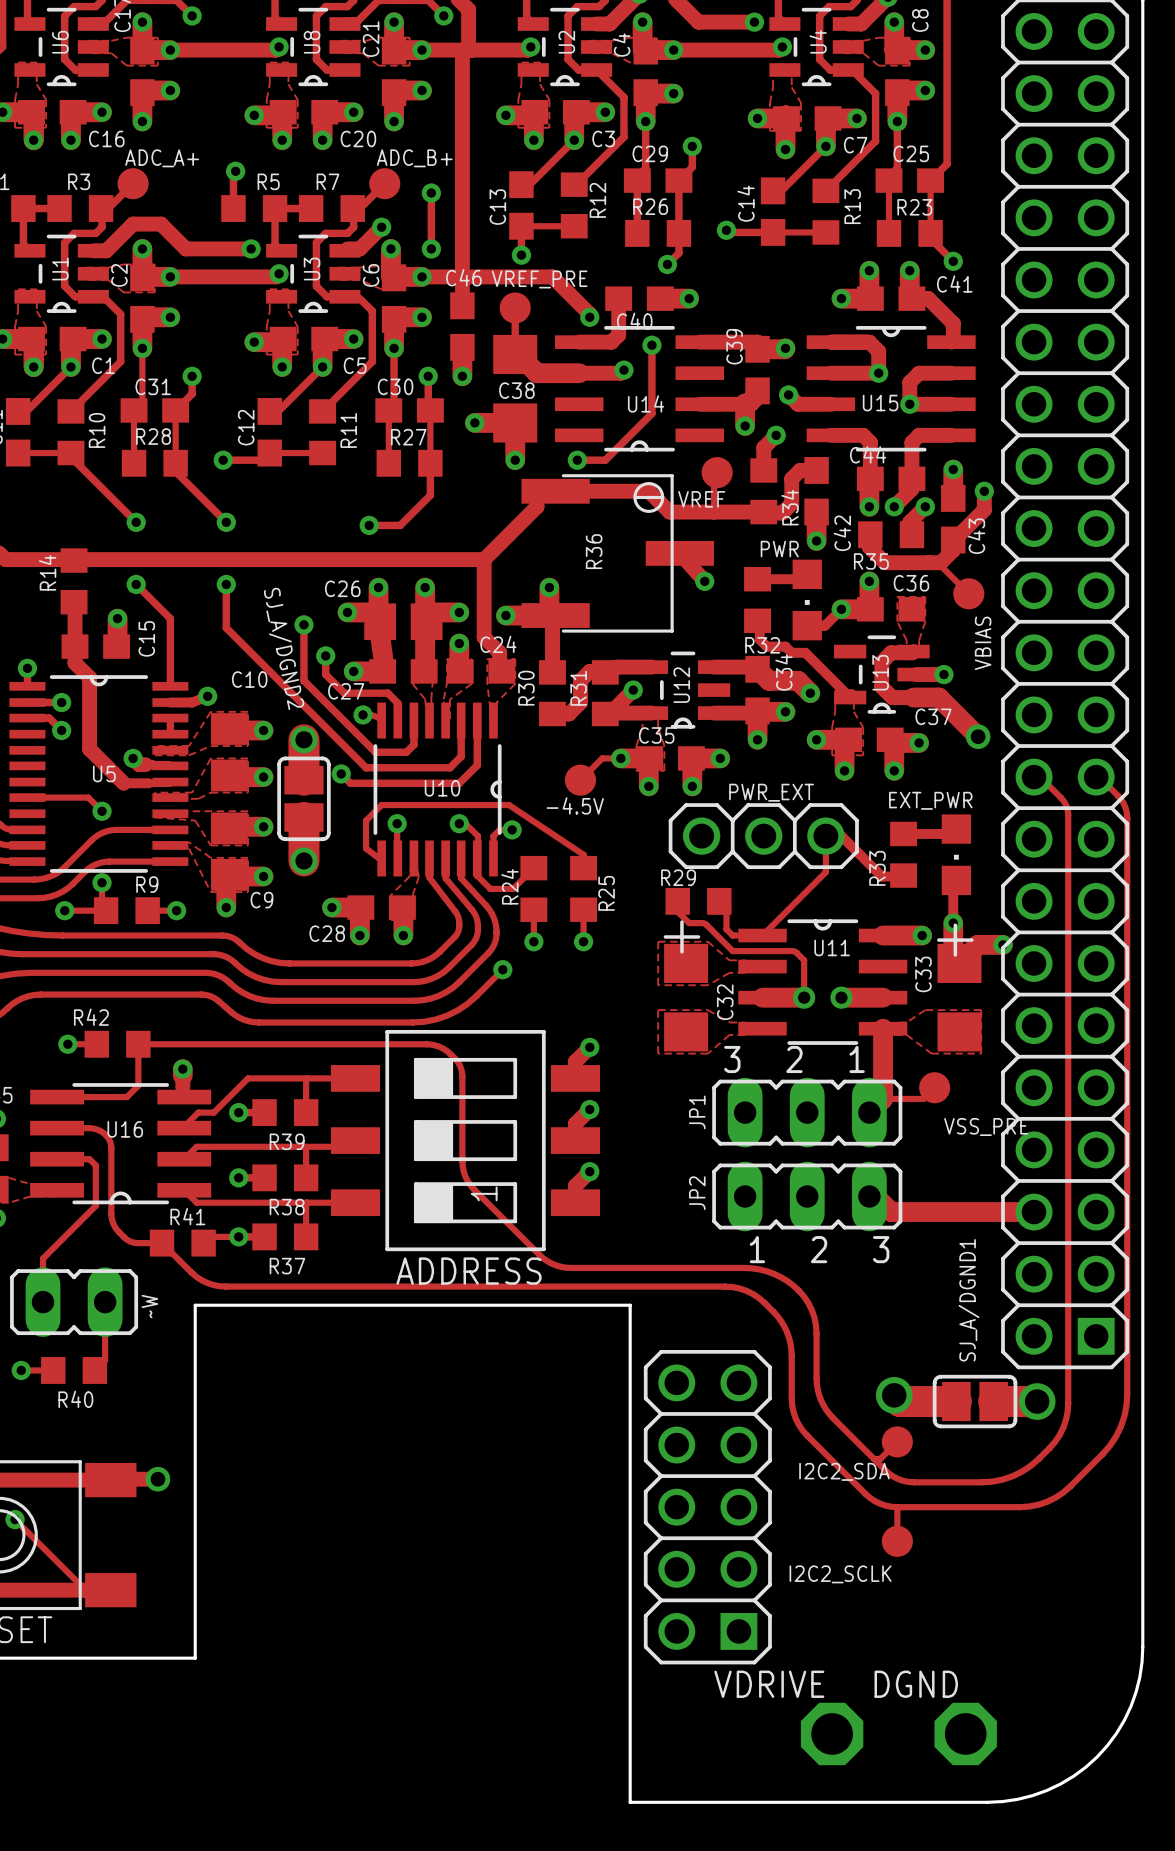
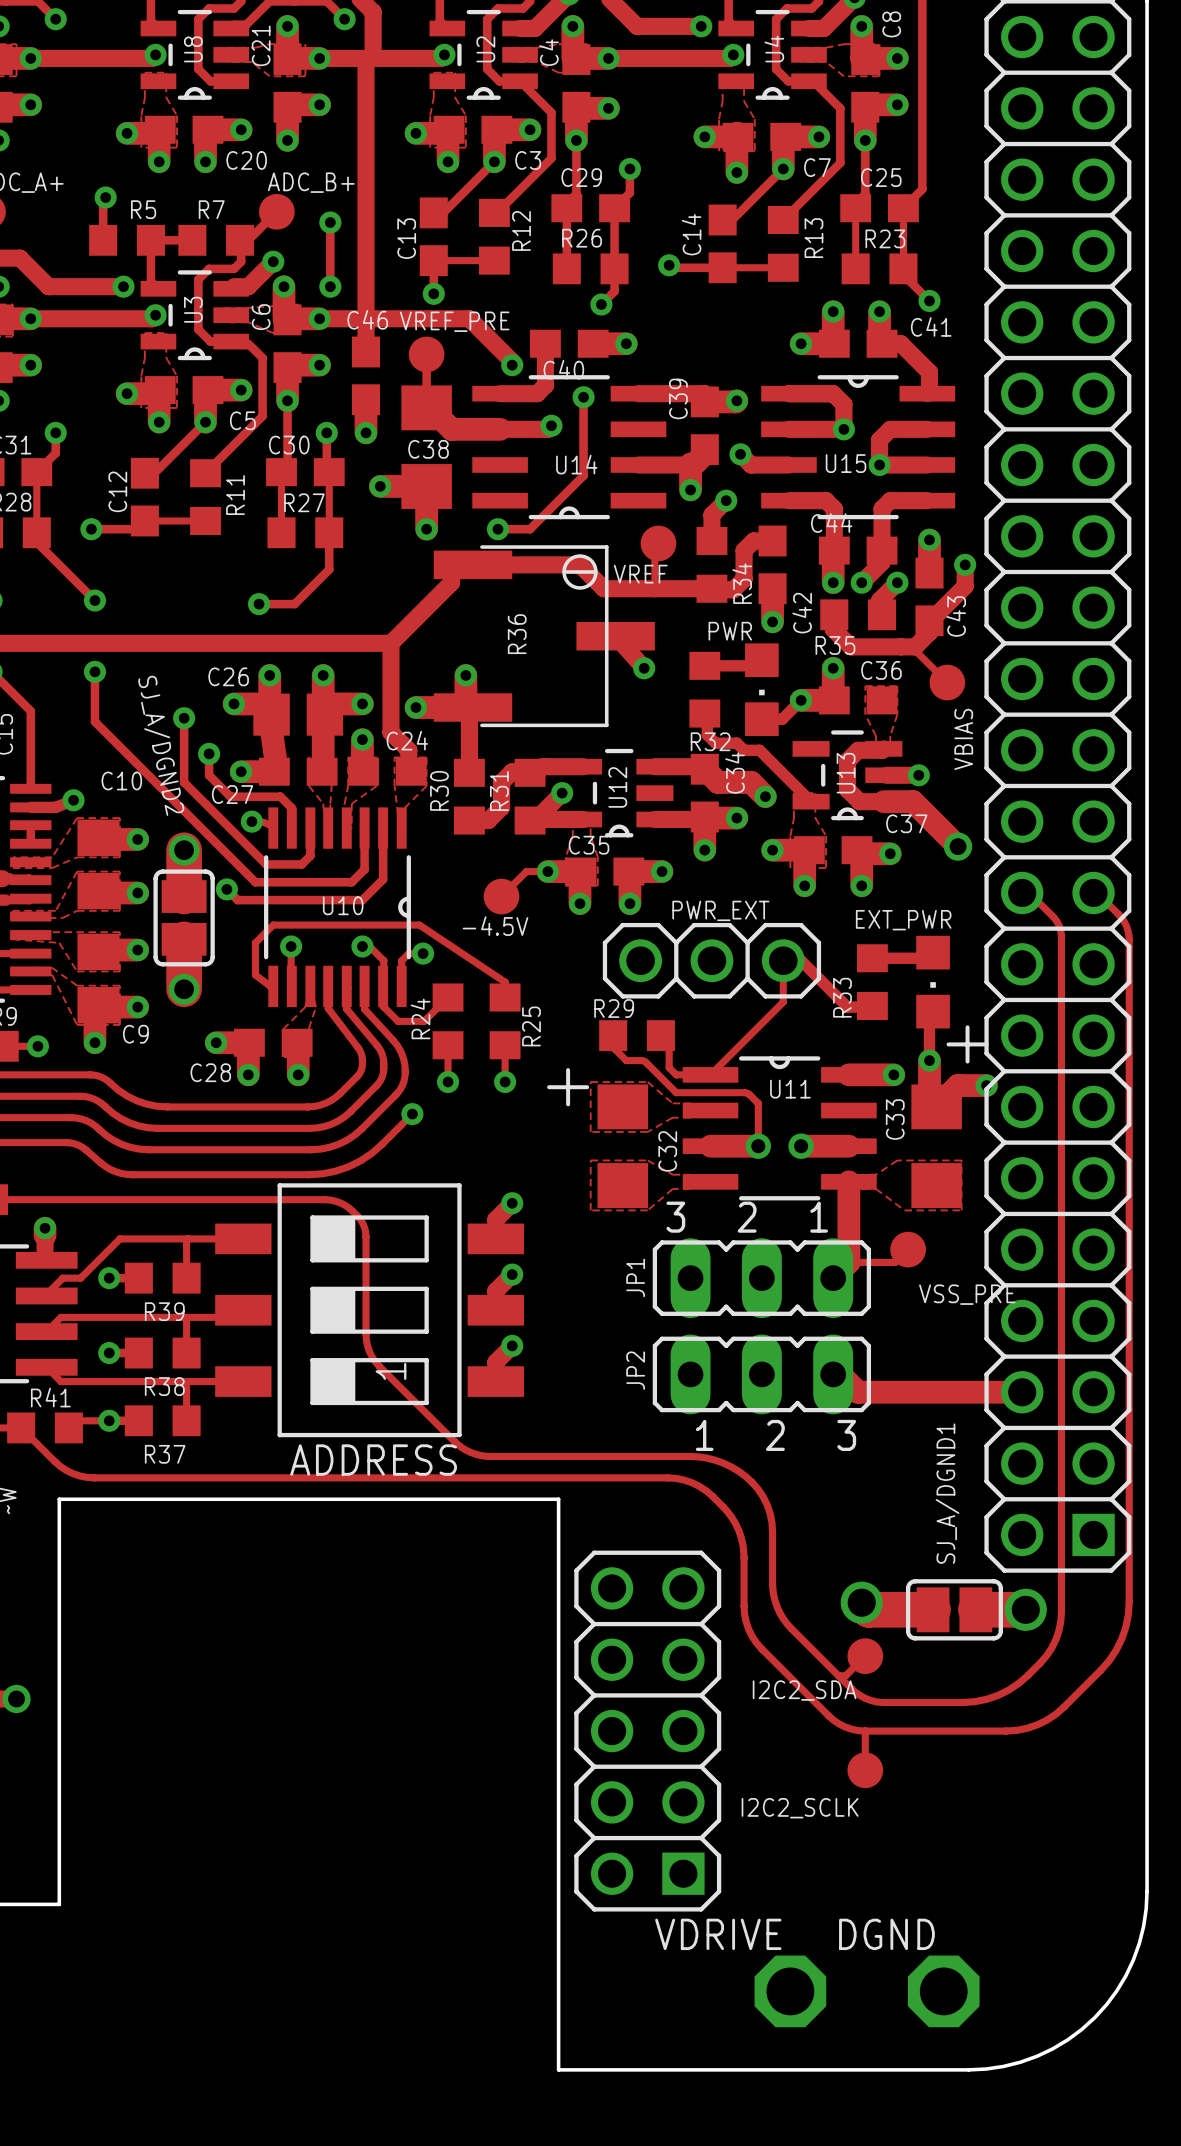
text position: + (681, 936) -> + (568, 1087)
text position: + (955, 940) -> + (967, 1044)

